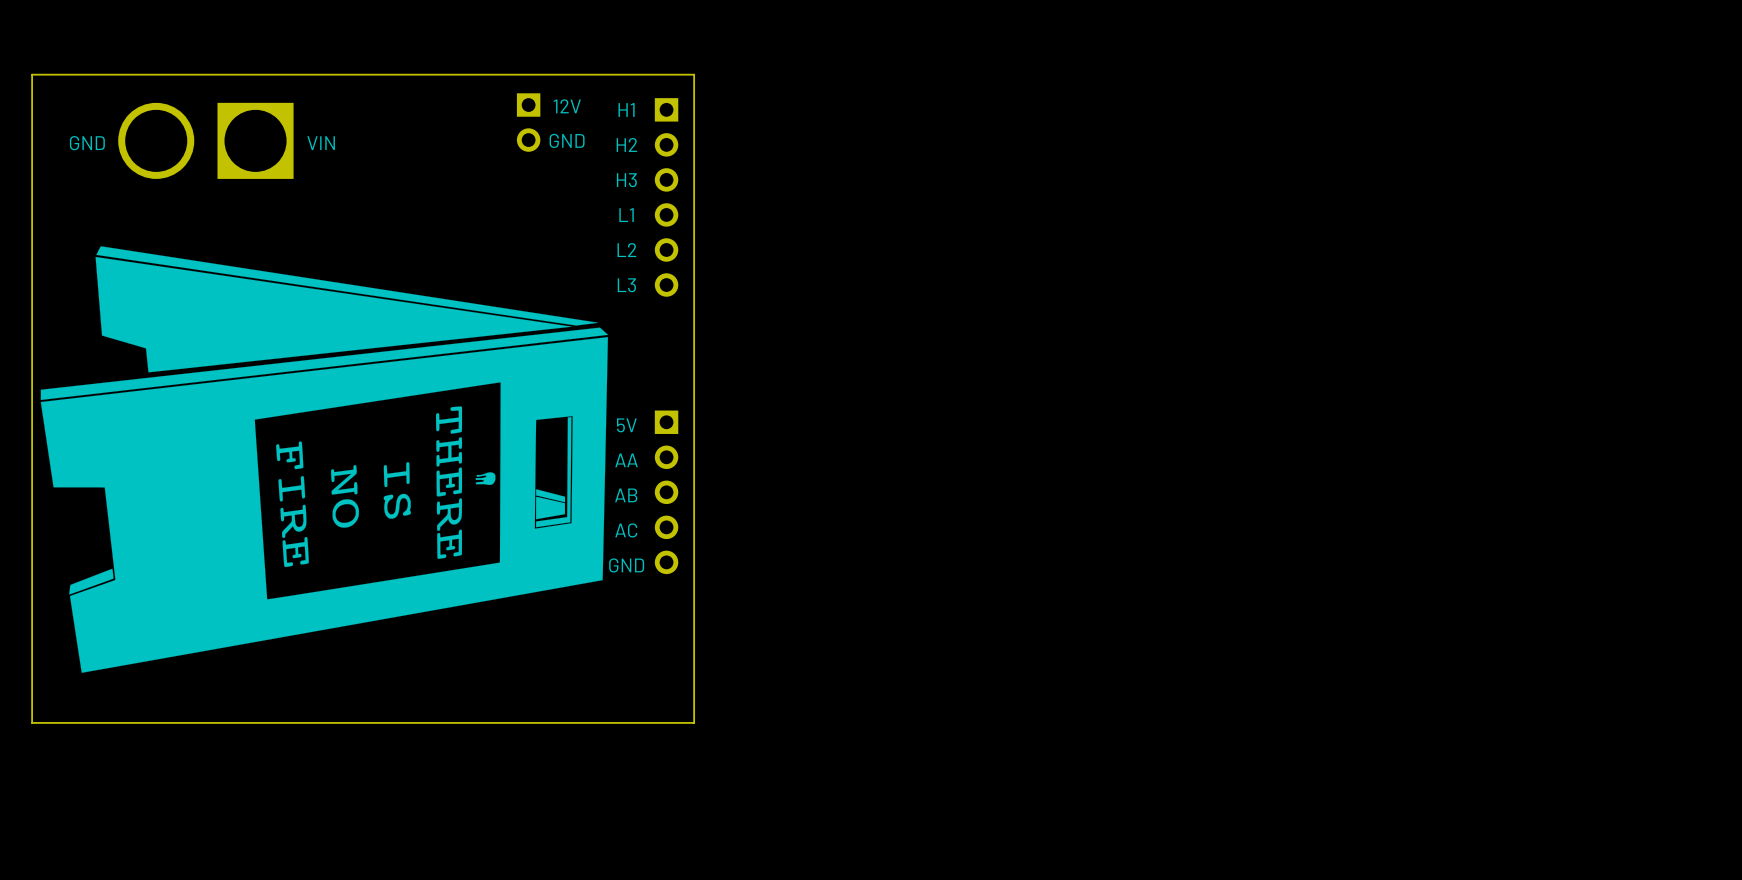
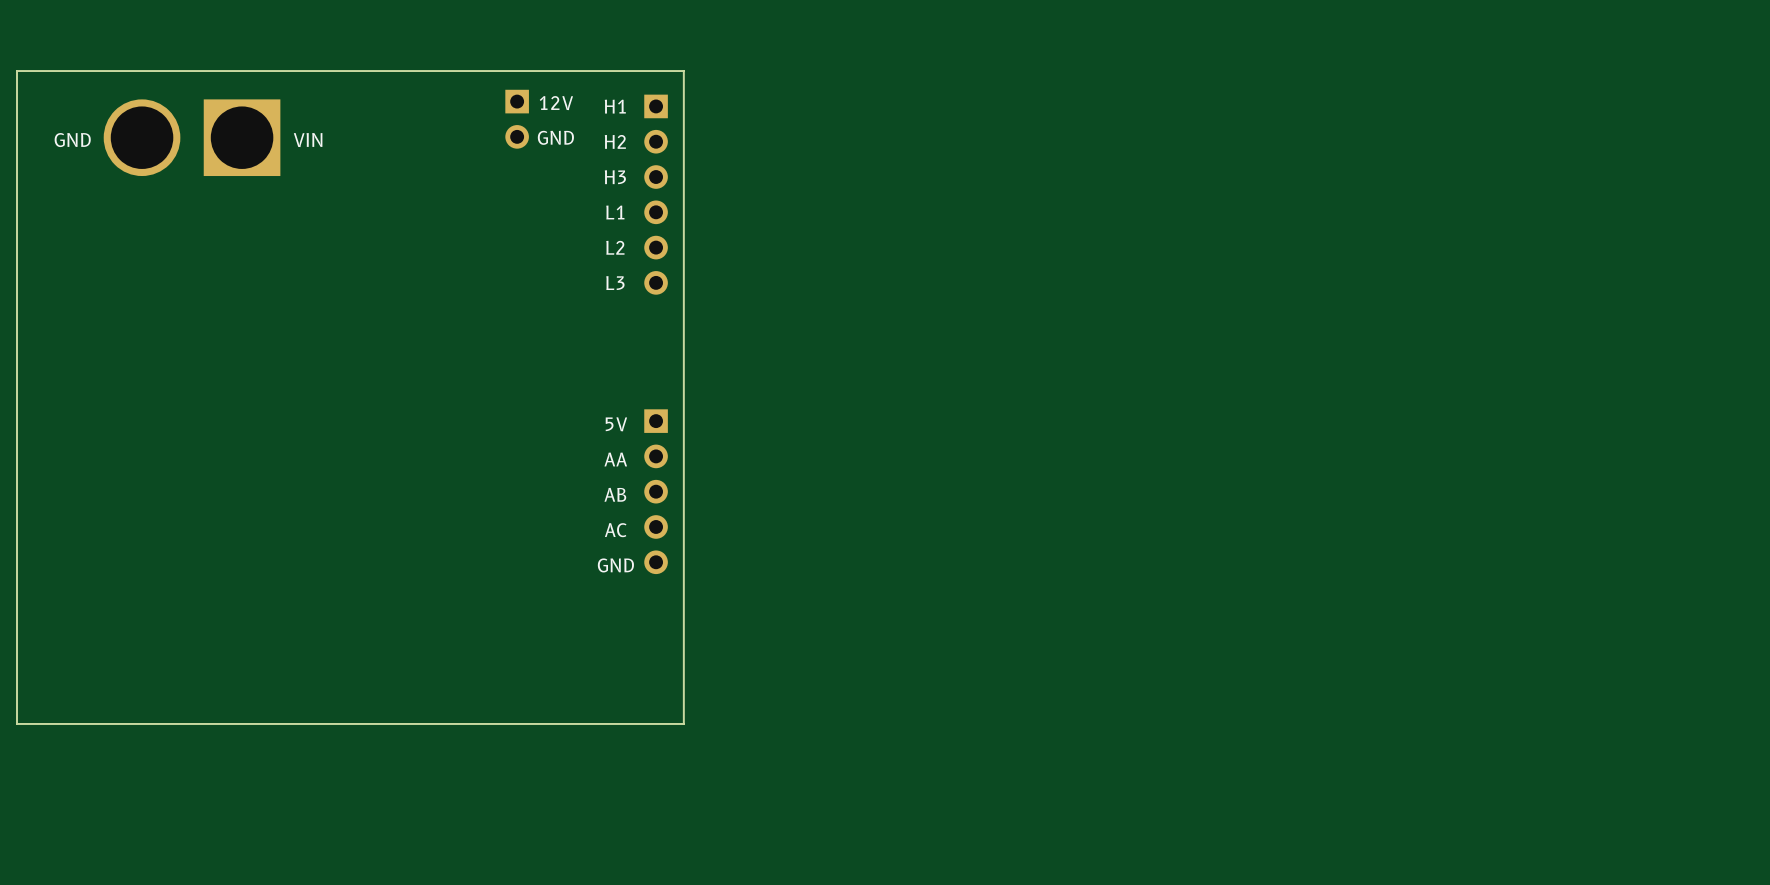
drawing: [40, 246, 608, 673] -> none

